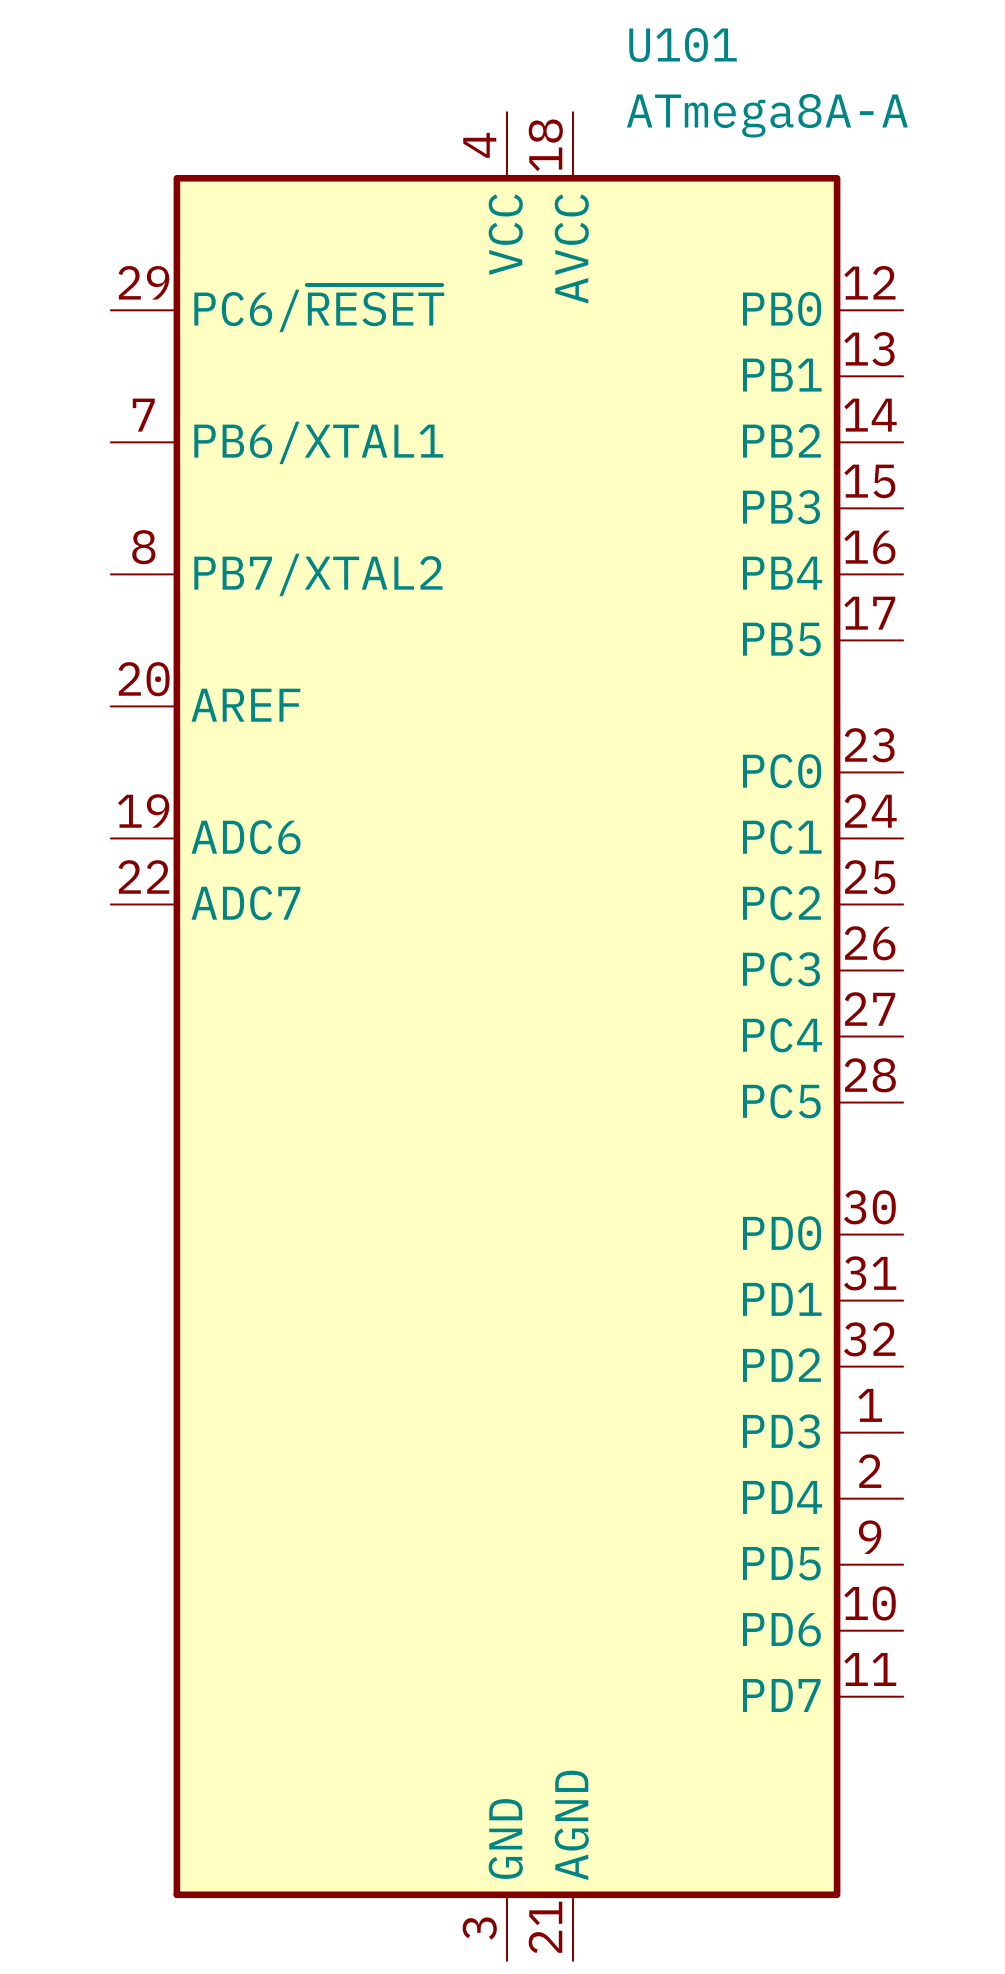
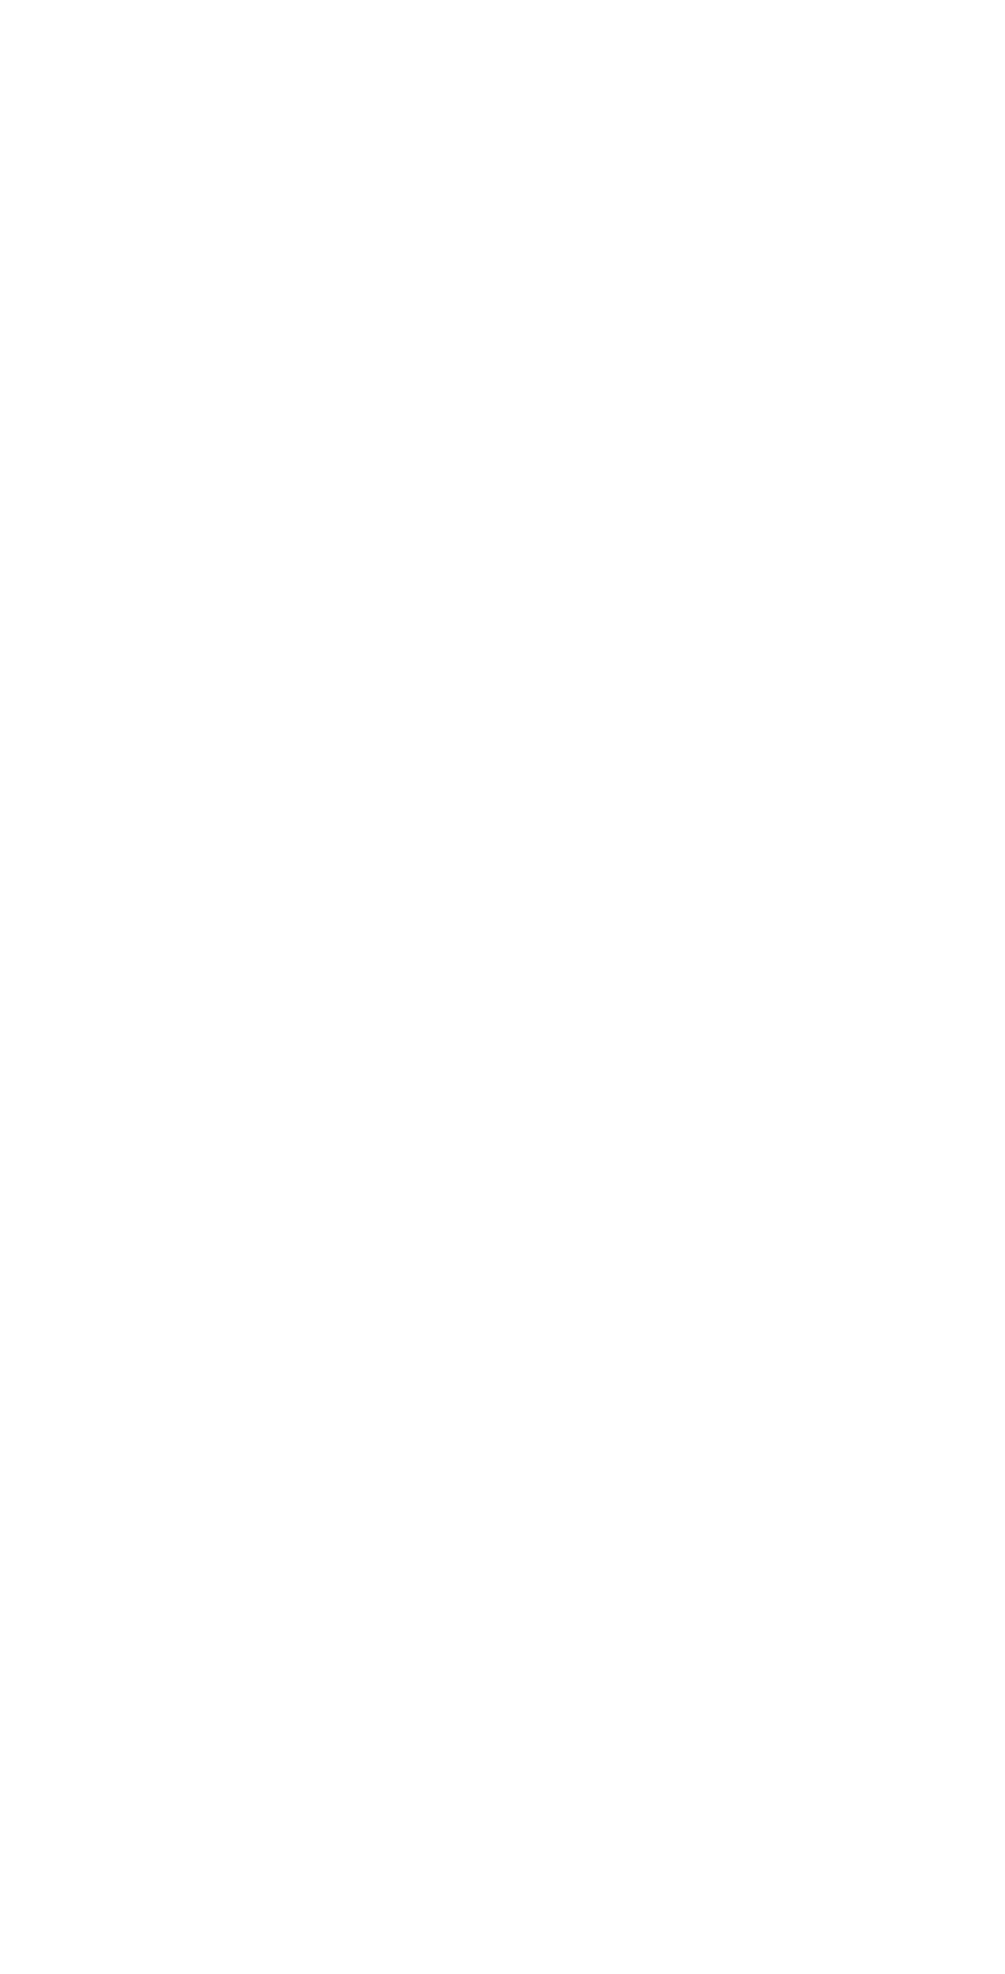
U101: ATmega8A-A (506, 1036) -> none

